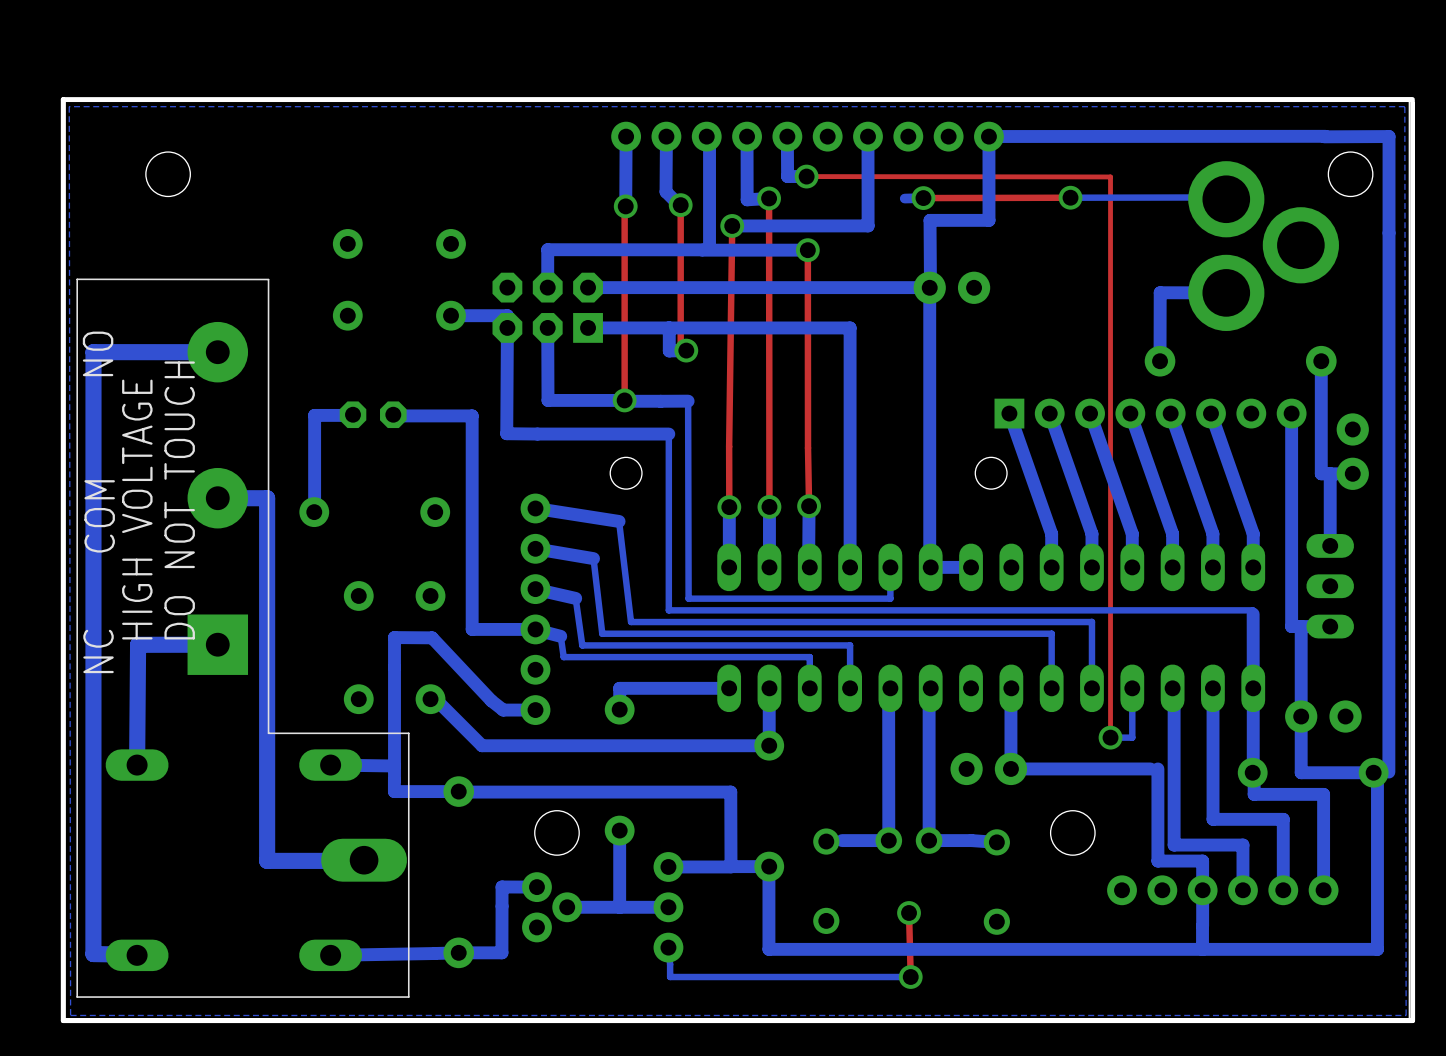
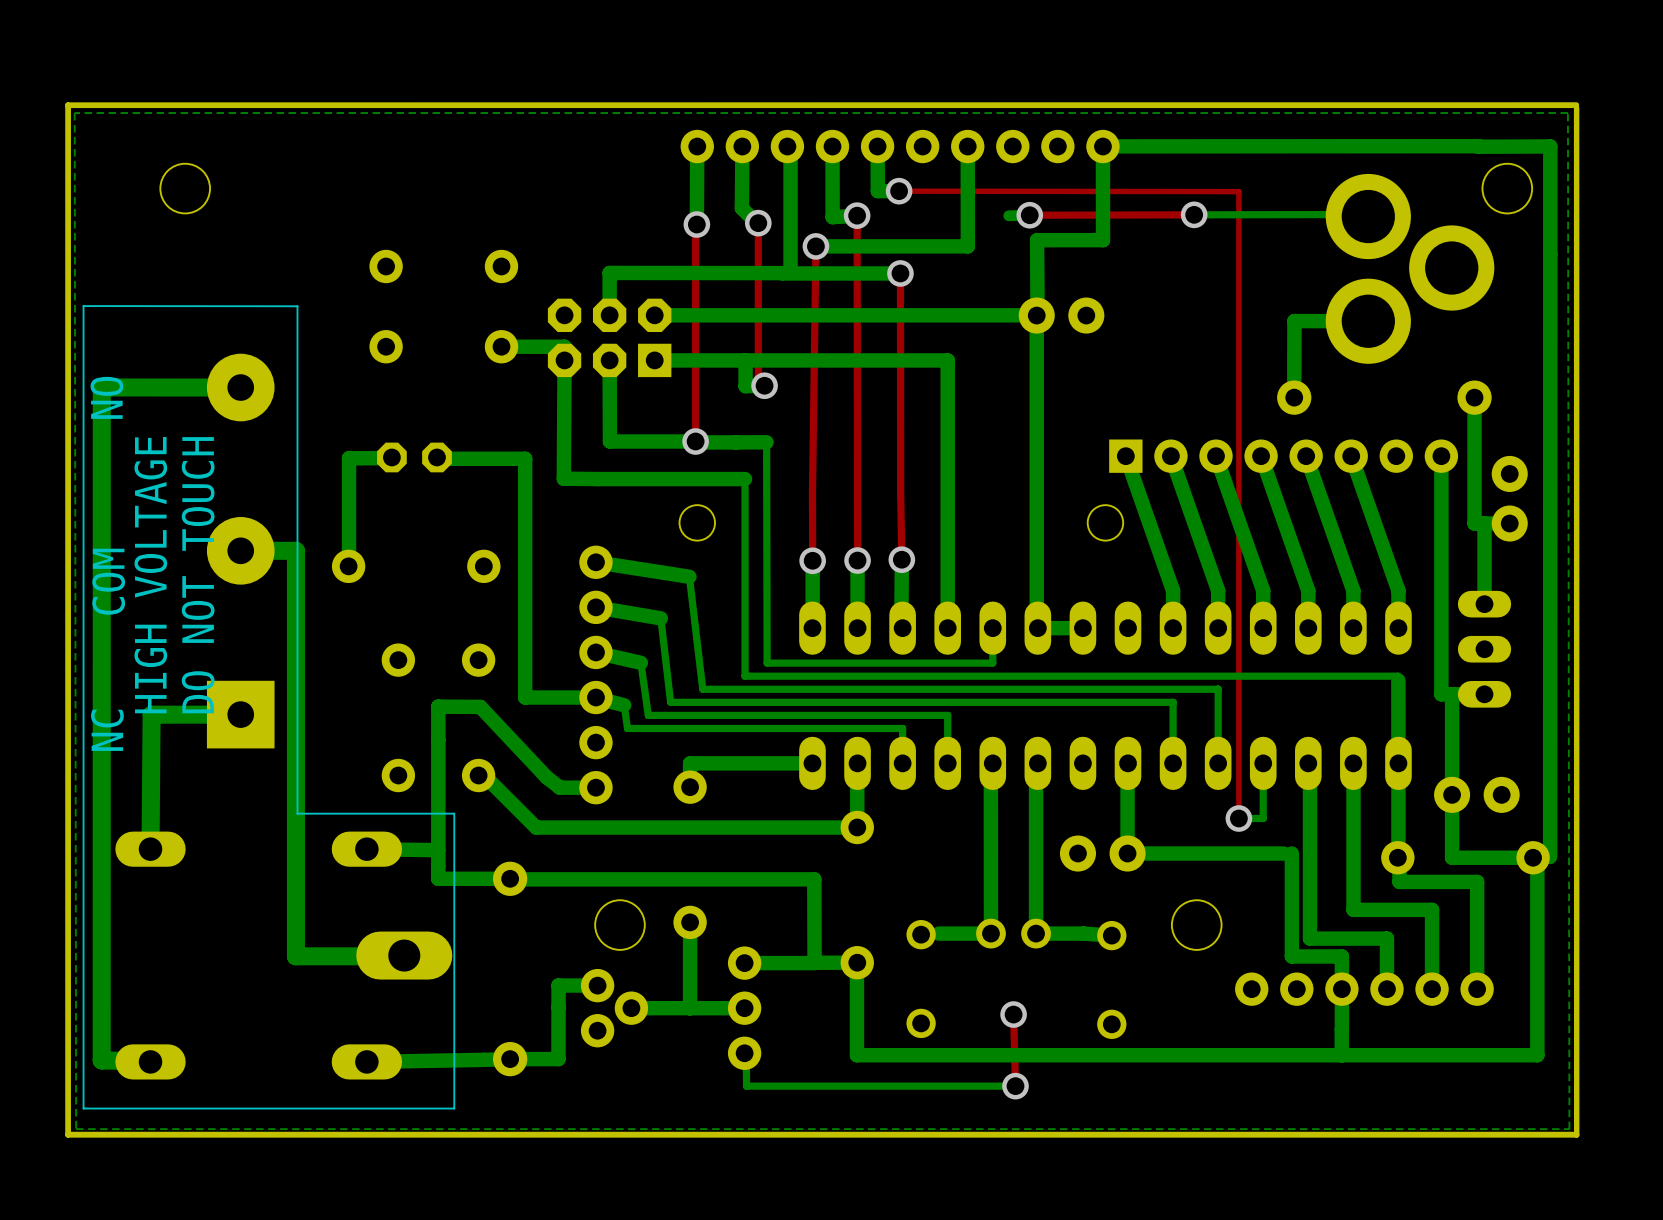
board edge: (1409, 101) (1409, 1018) -> none

